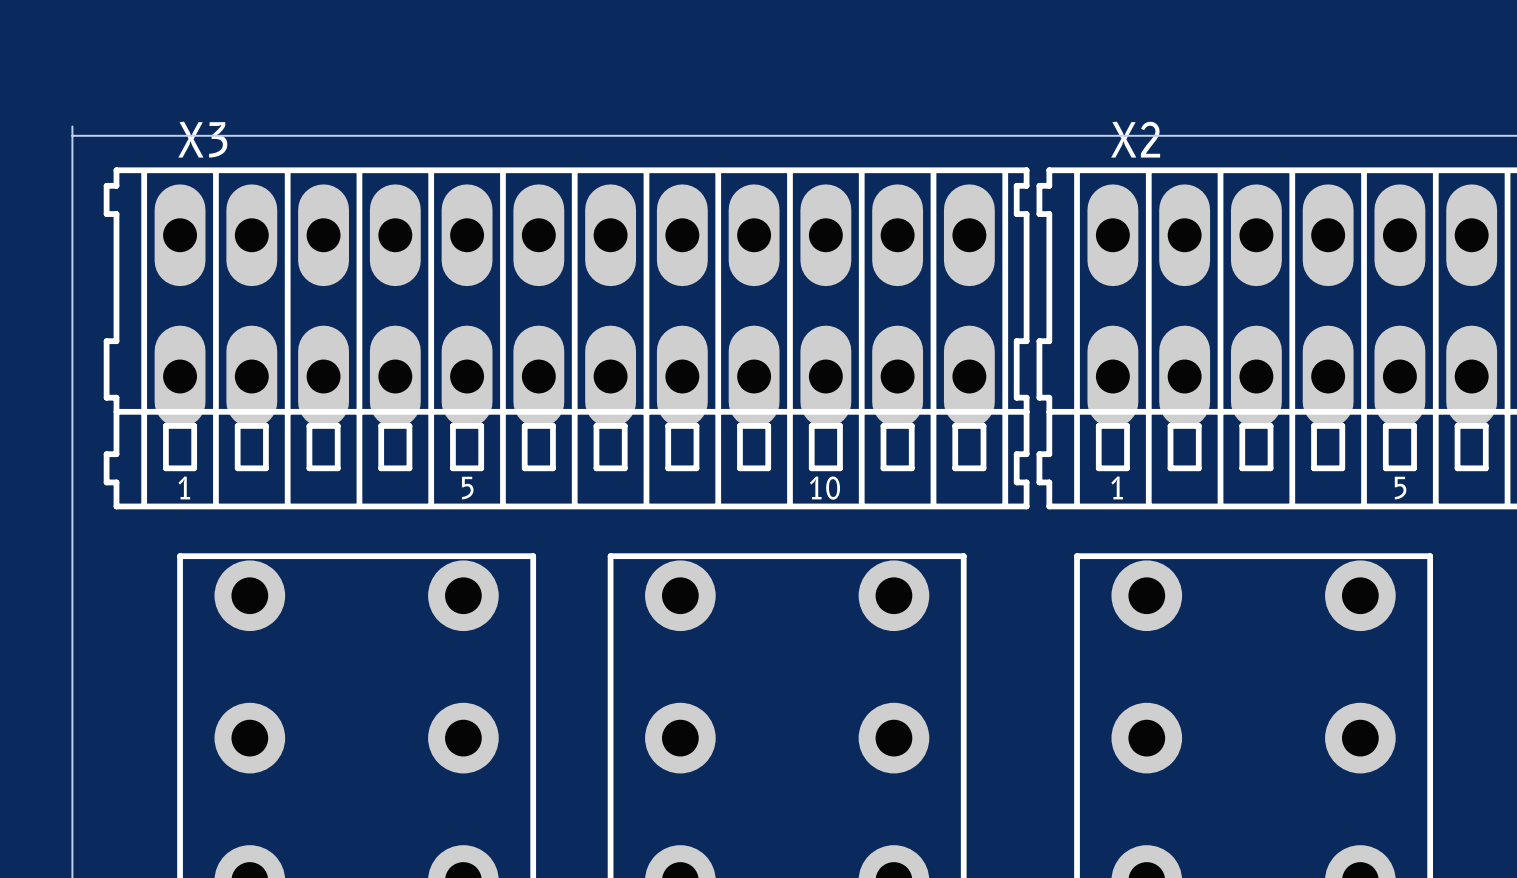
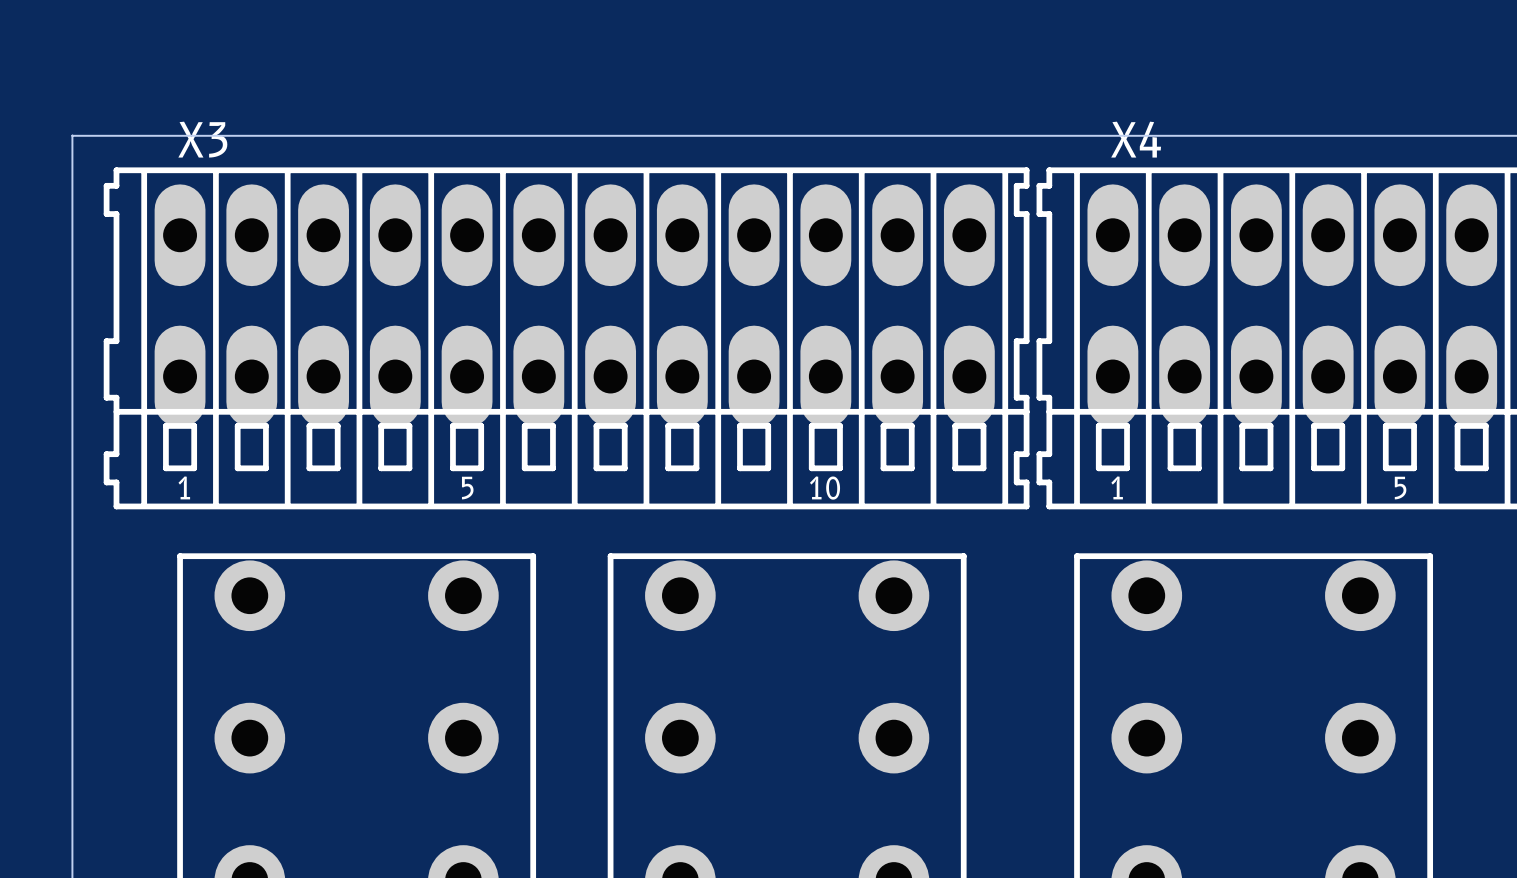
board edge: (72, 126) (72, 135) -> none
X2 name: X2 (1135, 139) -> X4 (1136, 139)

